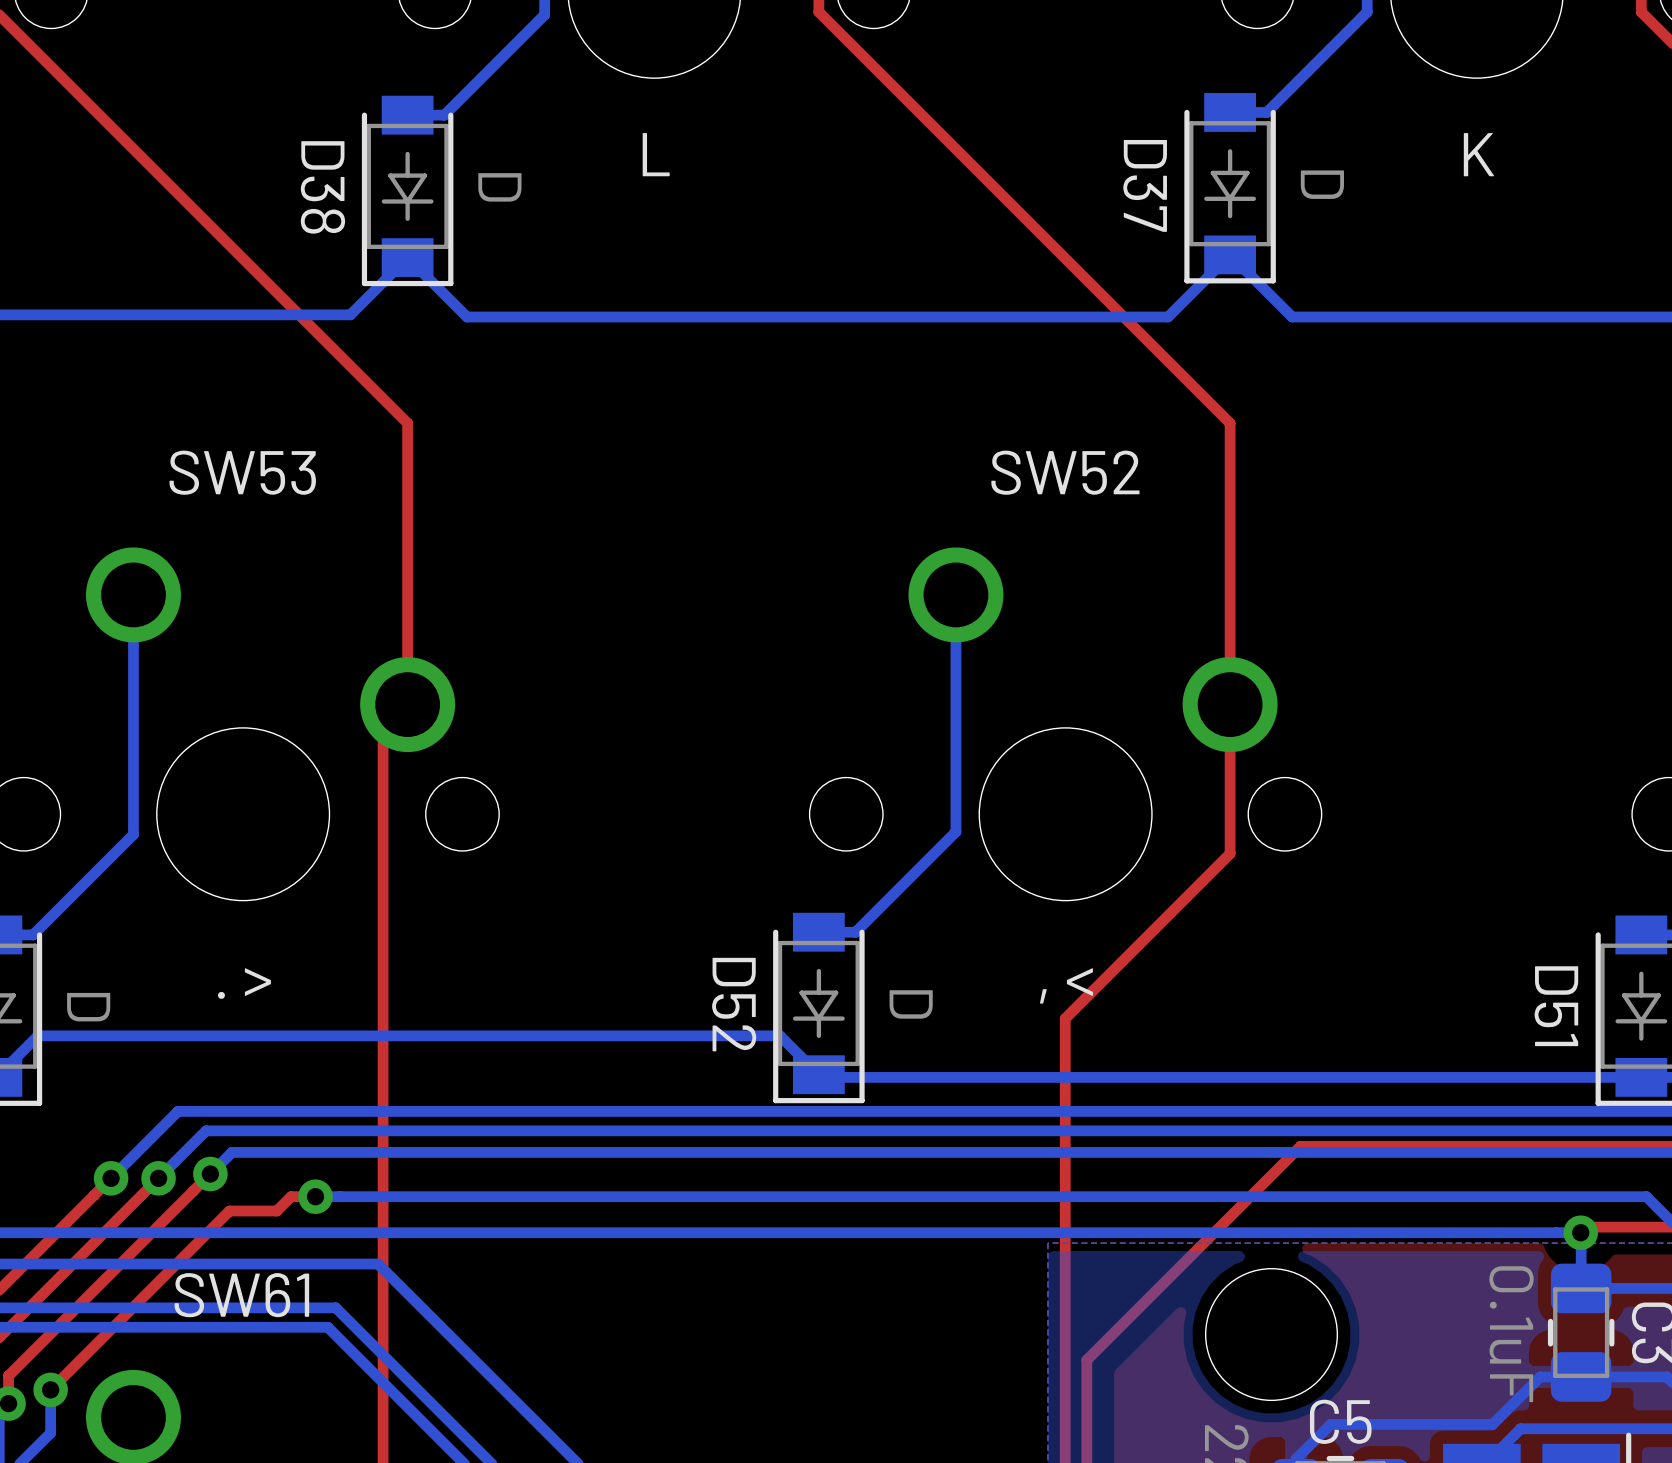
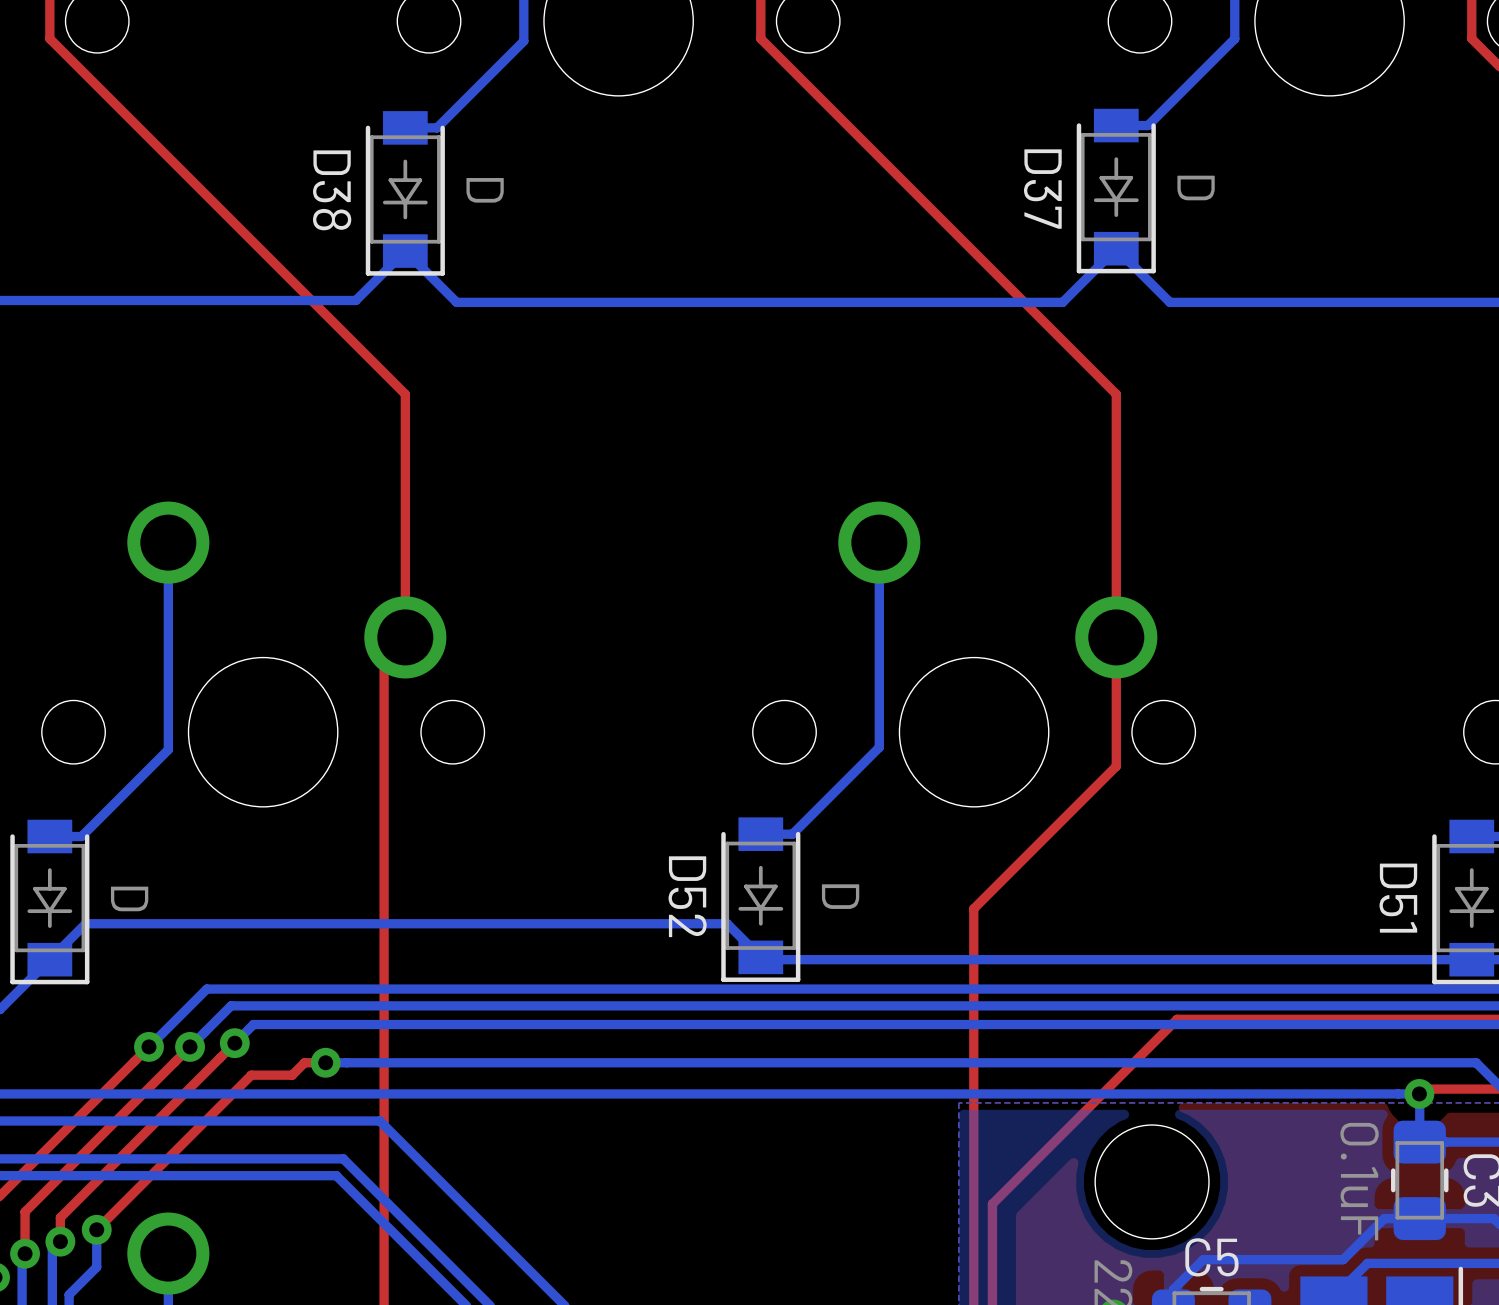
part value: L (656, 154) -> none
part value: K (1478, 154) -> none
SW53 name: SW53 (242, 472) -> none
SW52 name: SW52 (1065, 472) -> none
SW53 value: . > (244, 983) -> none
SW52 value: , < (1066, 985) -> none
SW61 name: SW61 (241, 1295) -> none

